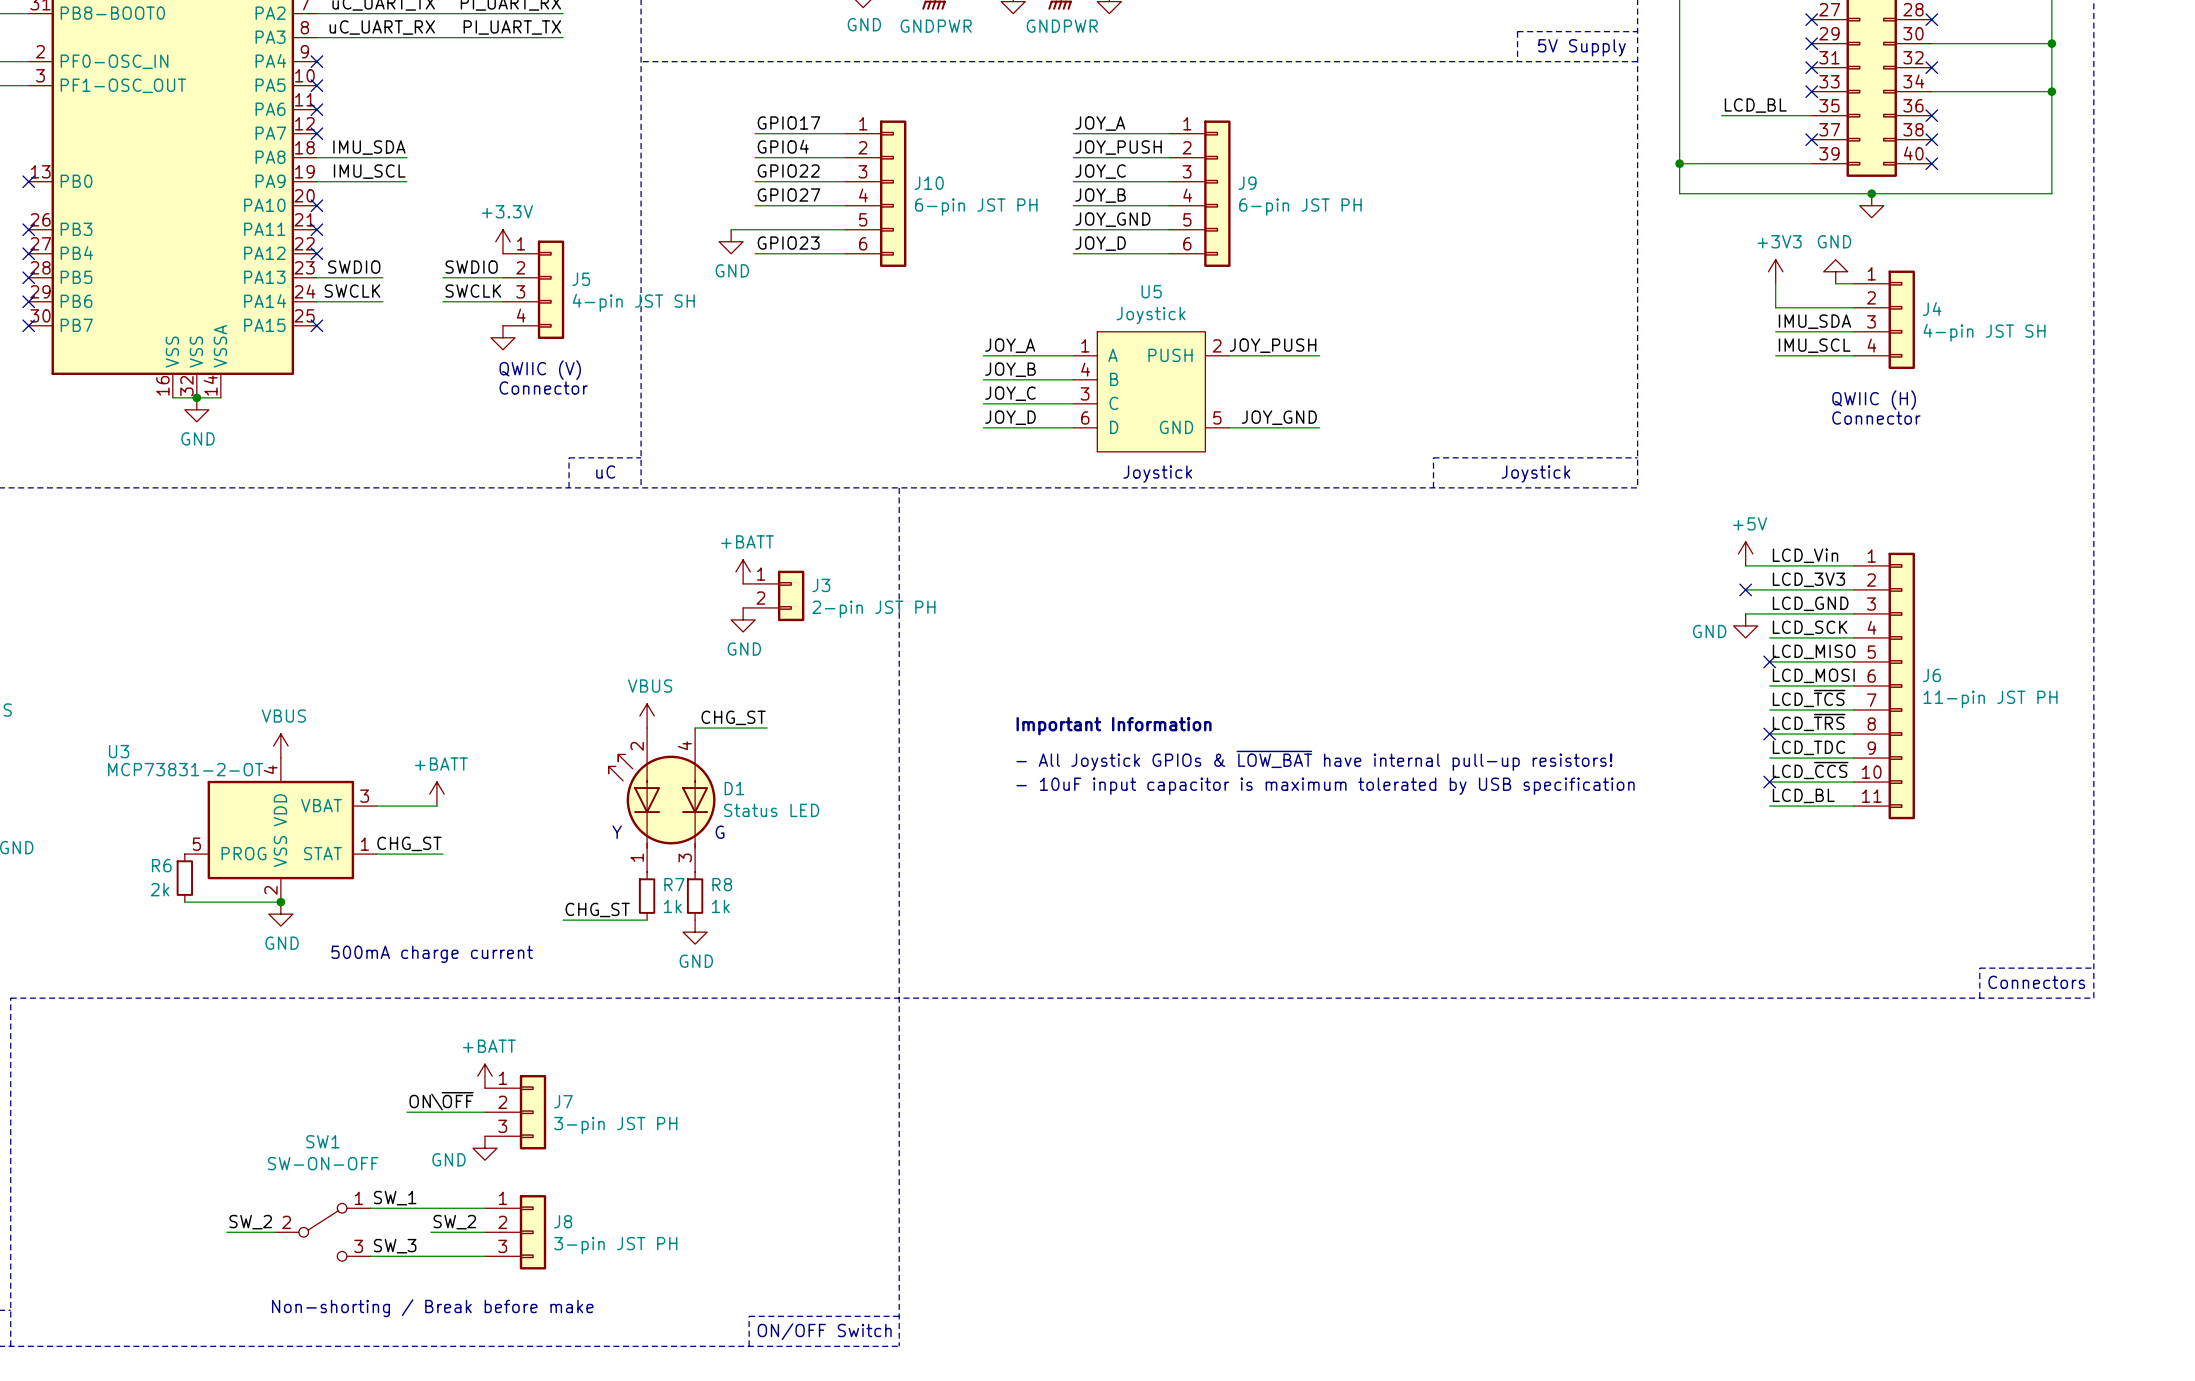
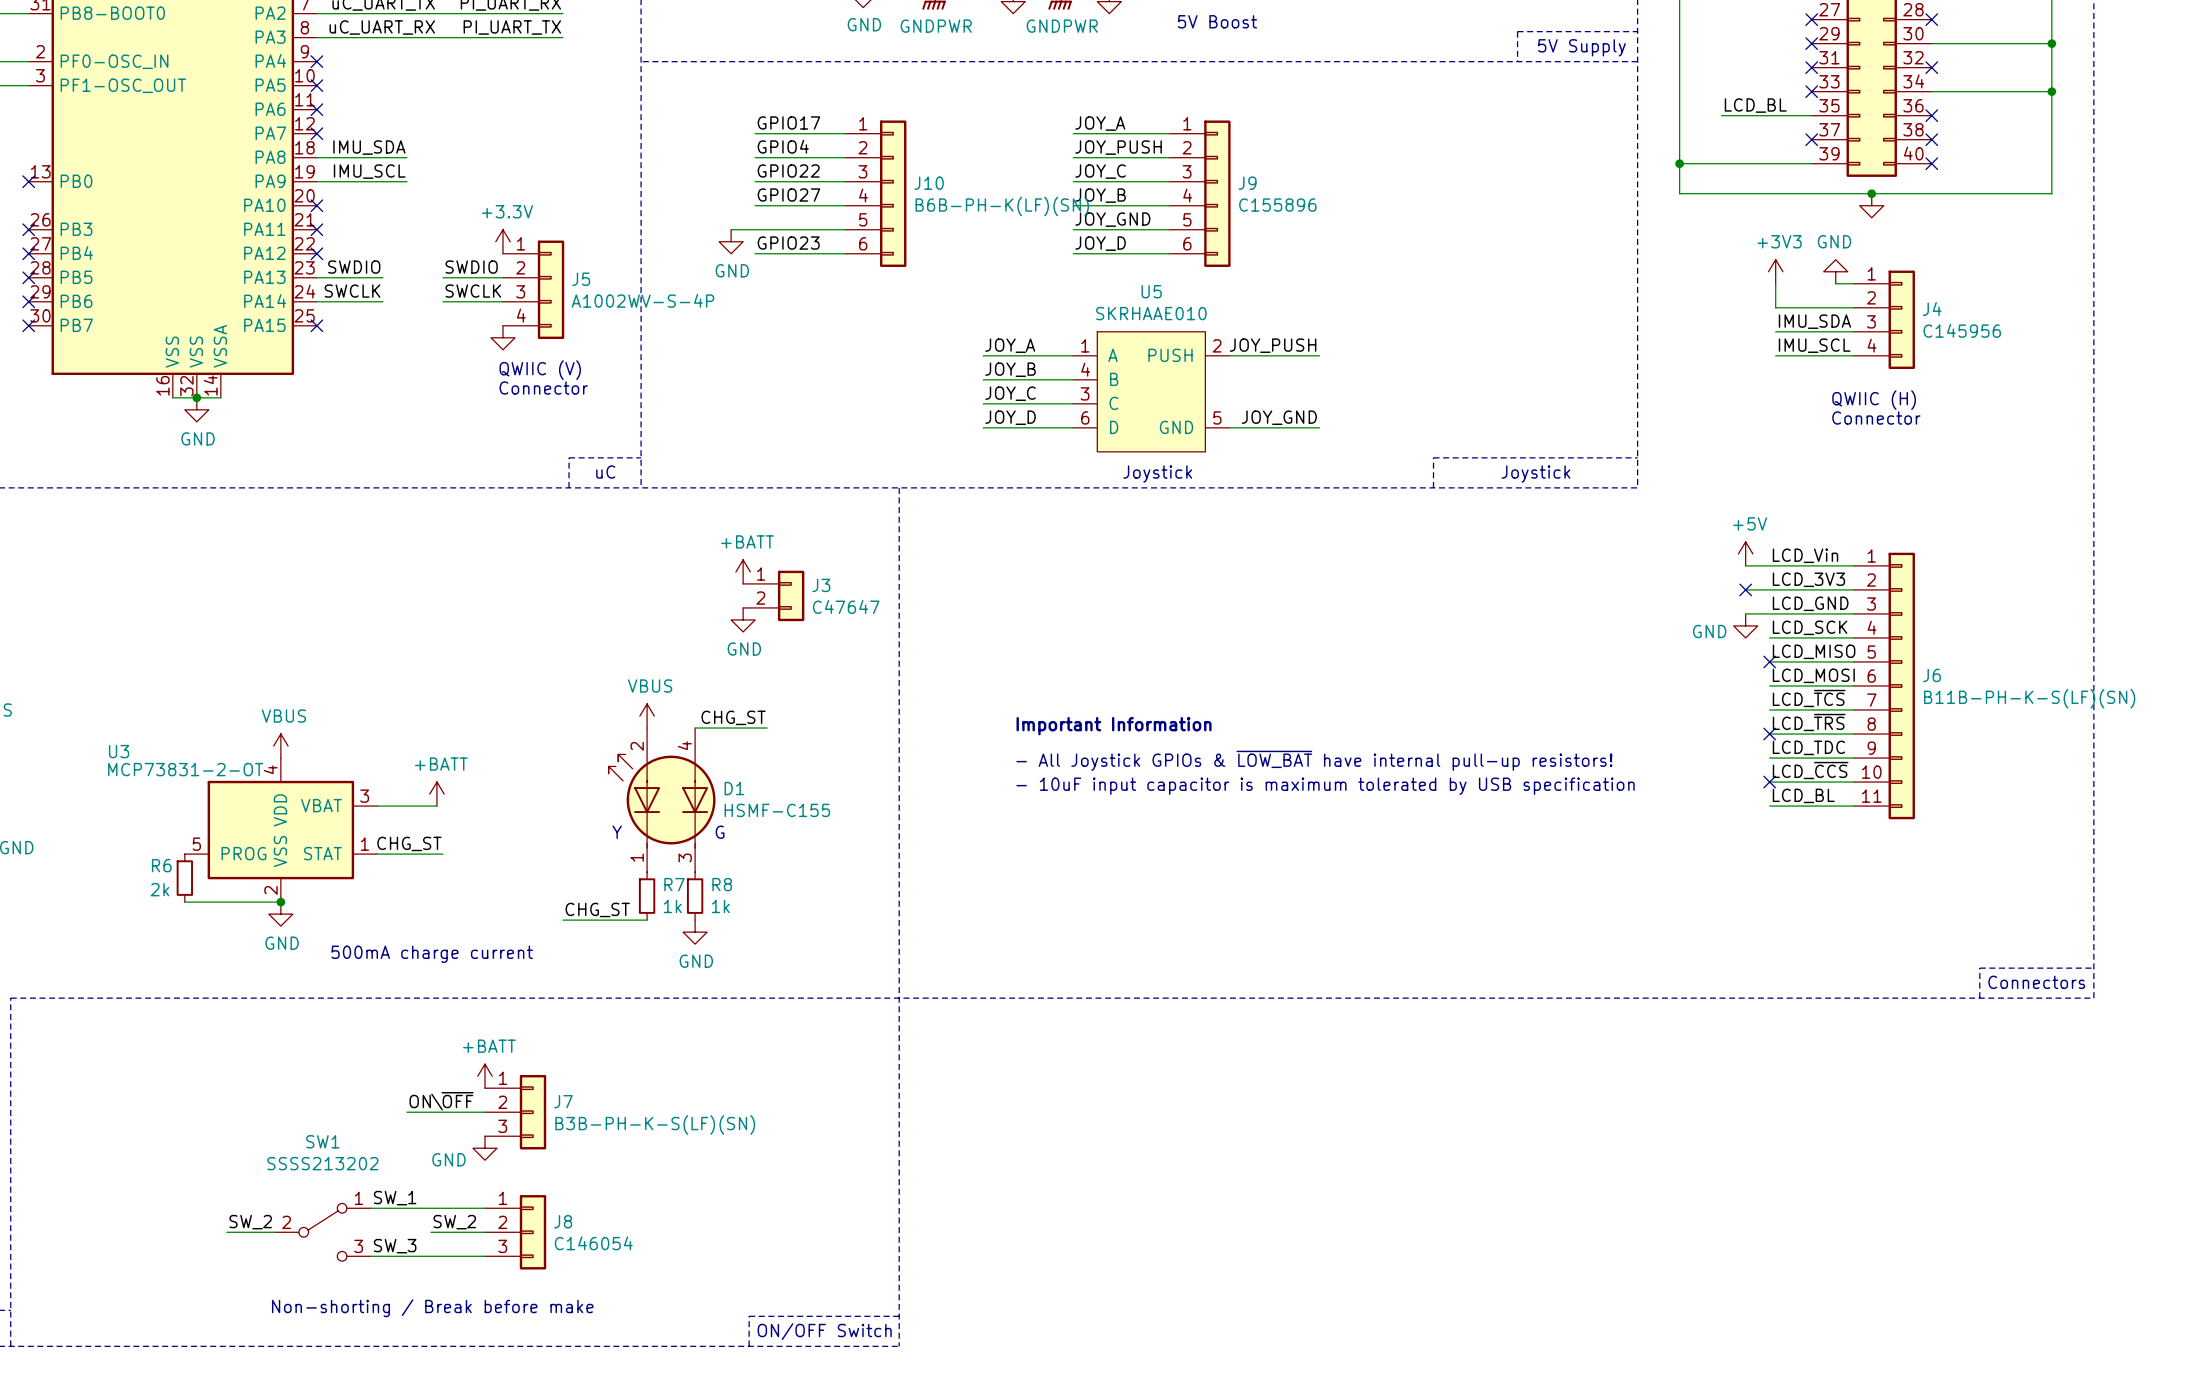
text: none -> 5V Boost (1217, 21)
J10 value: 6-pin JST PH (976, 207) -> B6B-PH-K(LF)(SN) (1002, 206)
J9 value: 6-pin JST PH (1300, 207) -> C155896 (1277, 205)
J5 value: 4-pin JST SH (633, 302) -> A1002WV-S-4P (642, 300)
U5 value: Joystick (1151, 315) -> SKRHAAE010 (1151, 313)
J4 value: 4-pin JST SH (1984, 332) -> C145956 (1962, 330)
J3 value: 2-pin JST PH (873, 609) -> C47647 (846, 606)
J6 value: 11-pin JST PH (1990, 699) -> B11B-PH-K-S(LF)(SN) (2029, 698)
D1 value: Status LED (771, 810) -> HSMF-C155 (777, 810)
J7 value: 3-pin JST PH (615, 1125) -> B3B-PH-K-S(LF)(SN) (655, 1124)
SW1 value: SW-ON-OFF (323, 1163) -> SSSS213202 (322, 1163)
J8 value: 3-pin JST PH (615, 1245) -> C146054 (593, 1243)

